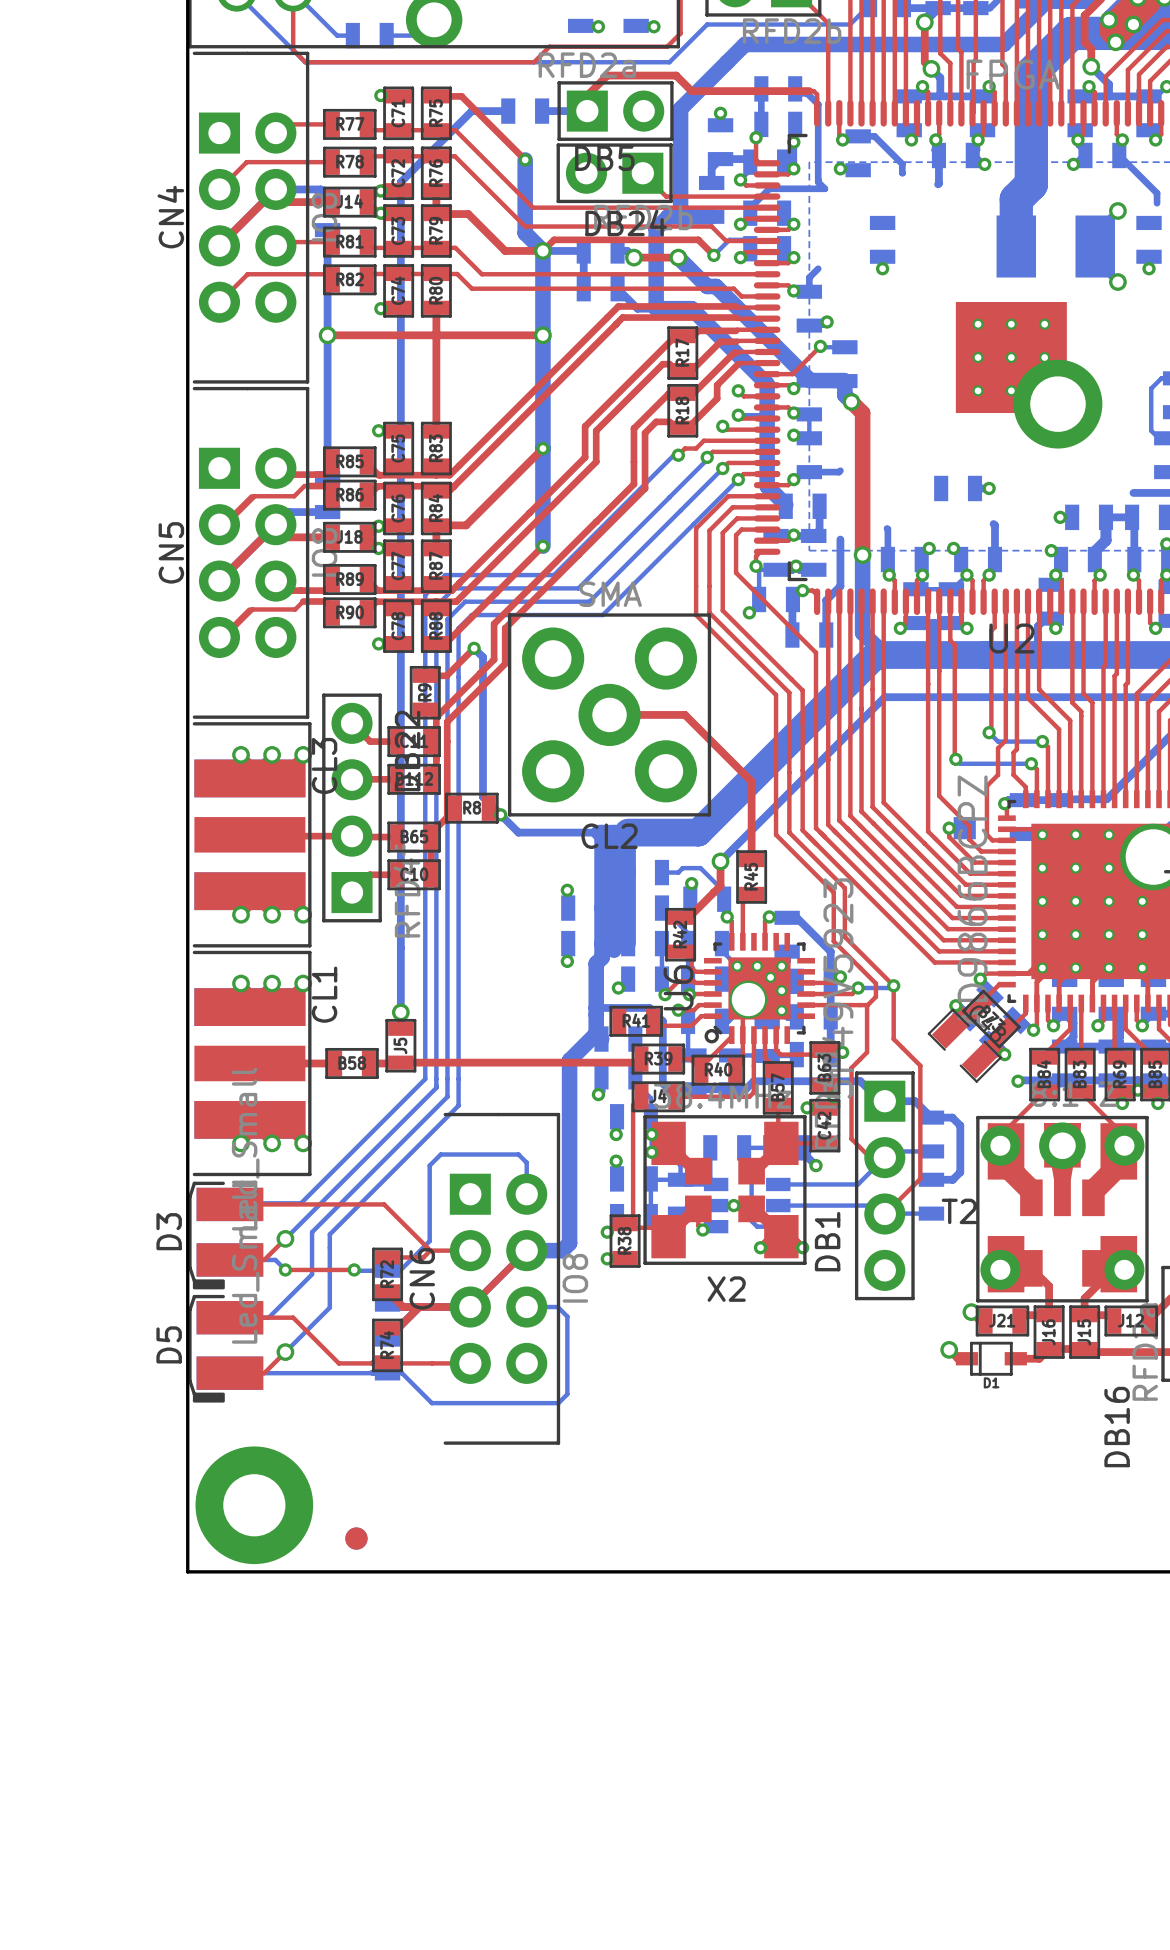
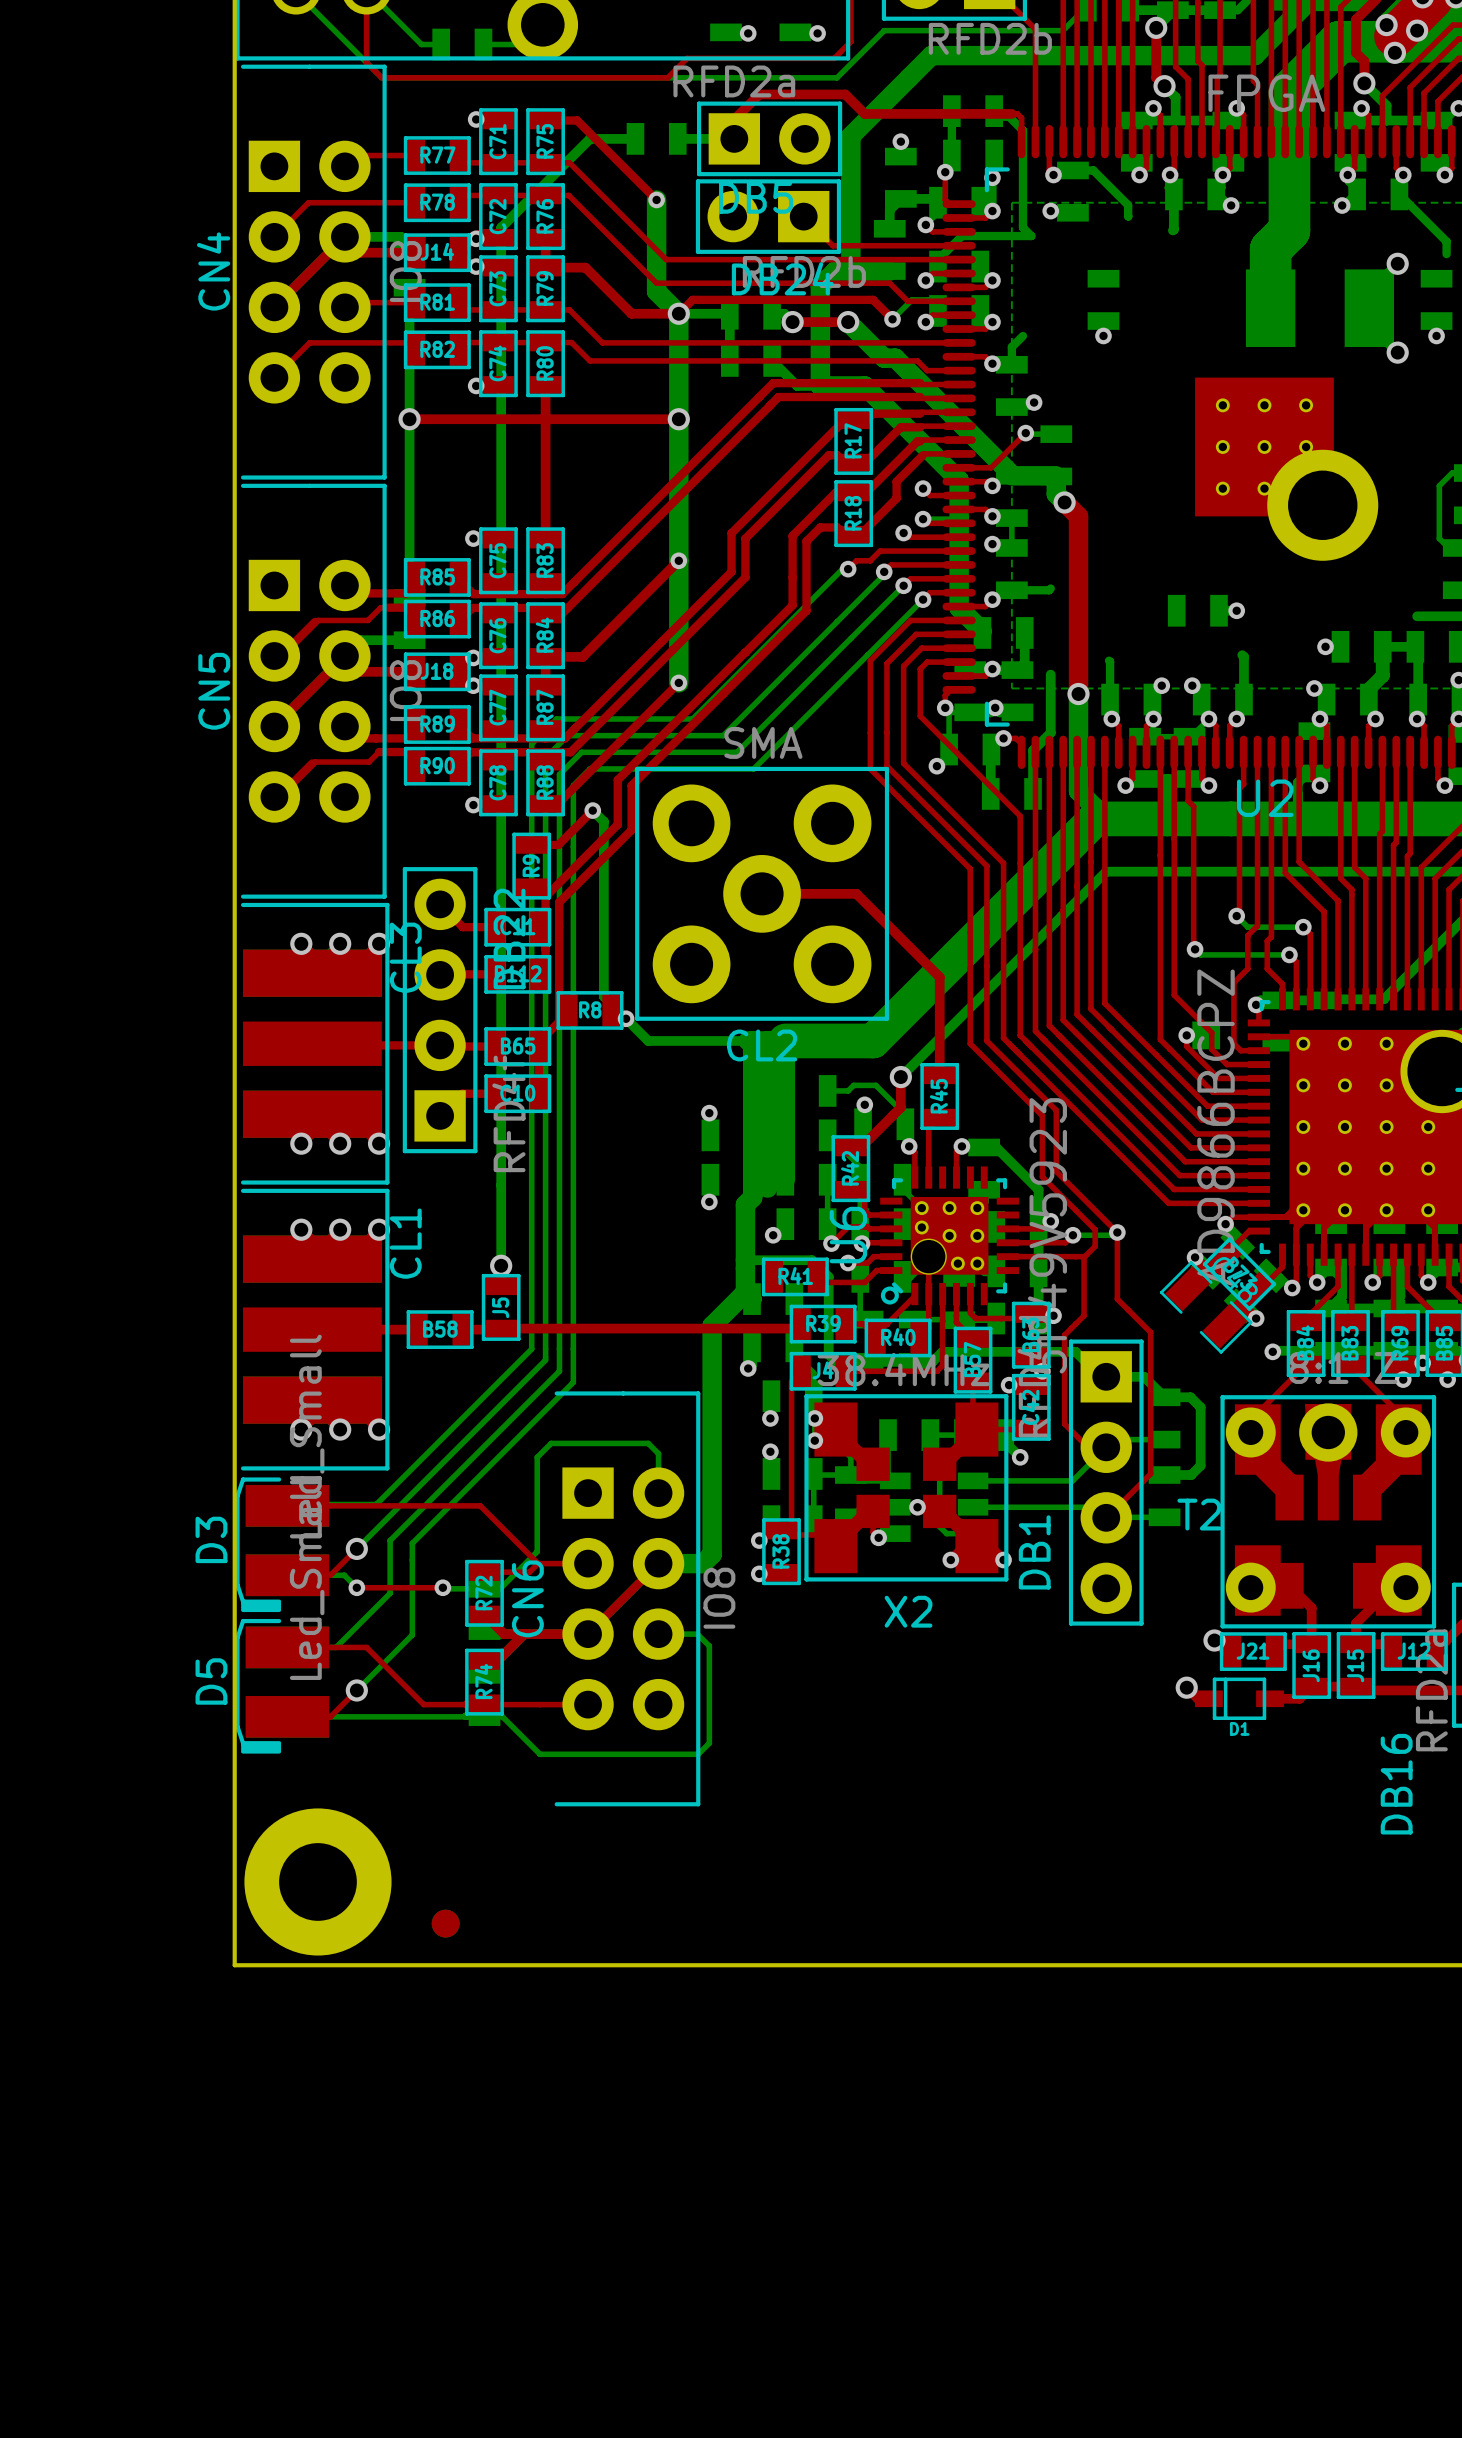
U6 footprint: [704, 932, 816, 1044] -> [880, 1166, 1019, 1306]

